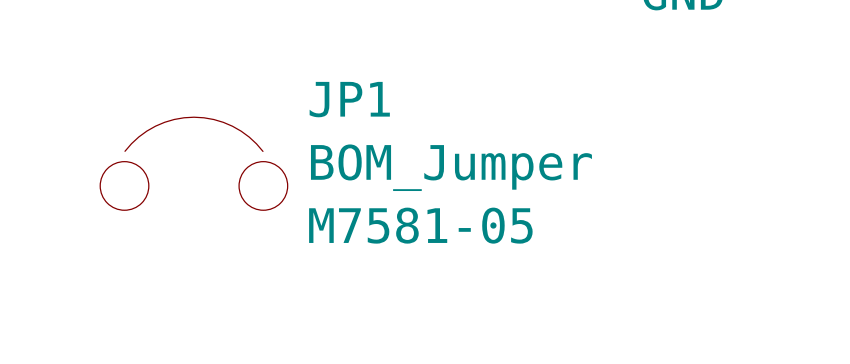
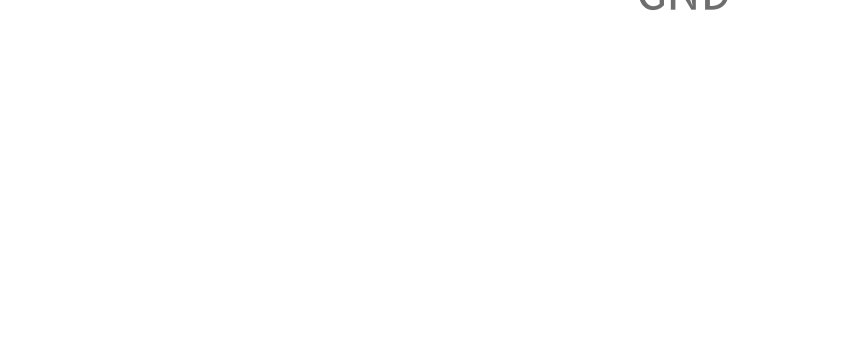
JP1: BOM_Jumper (193, 163) -> none

